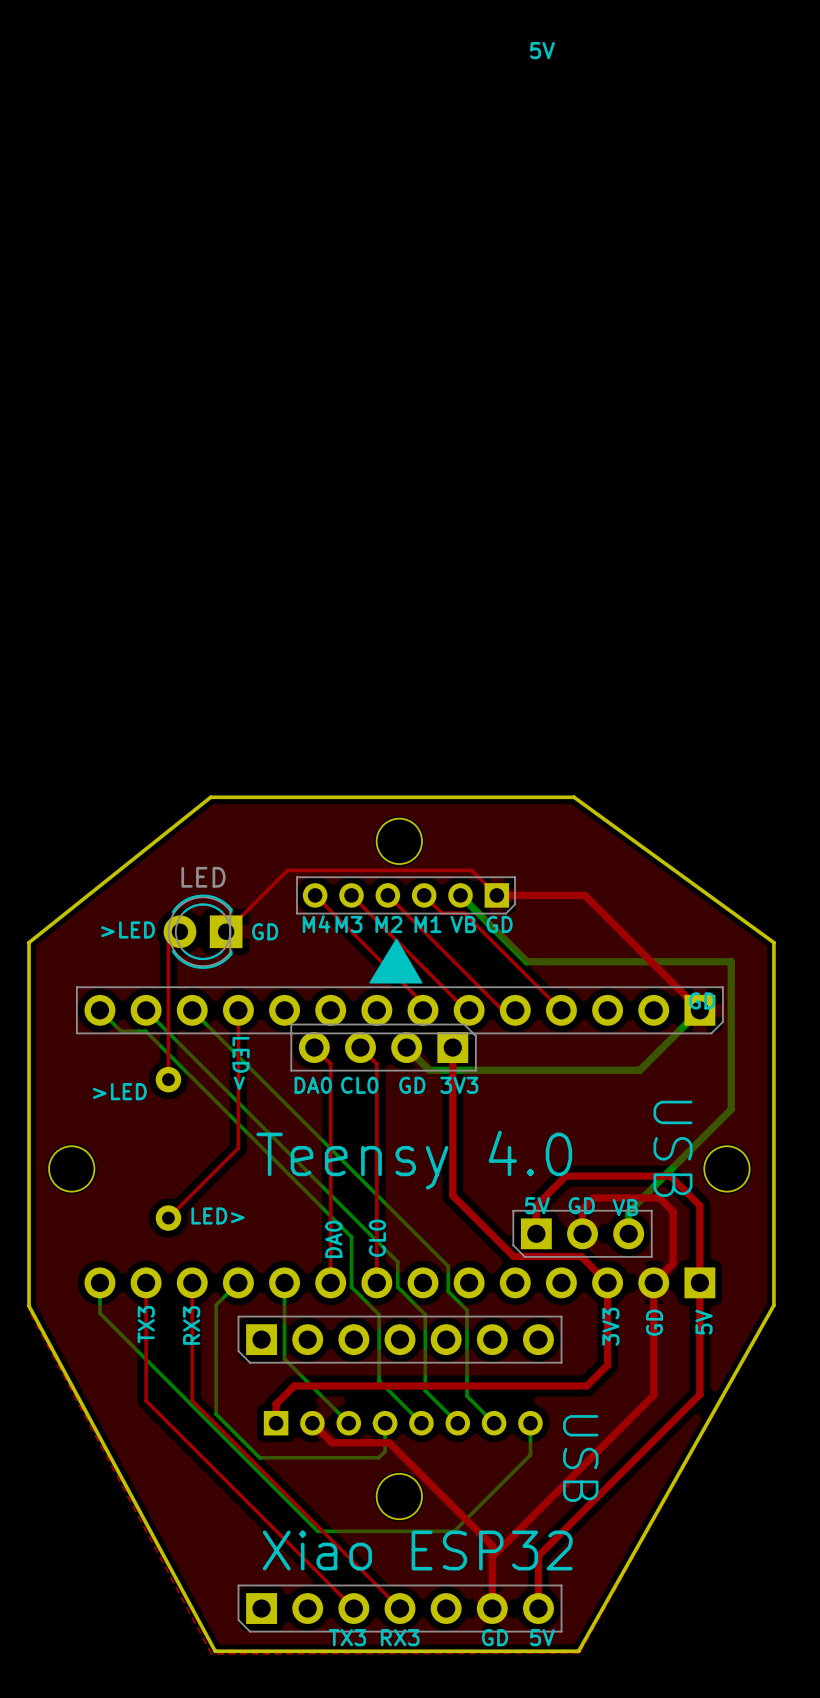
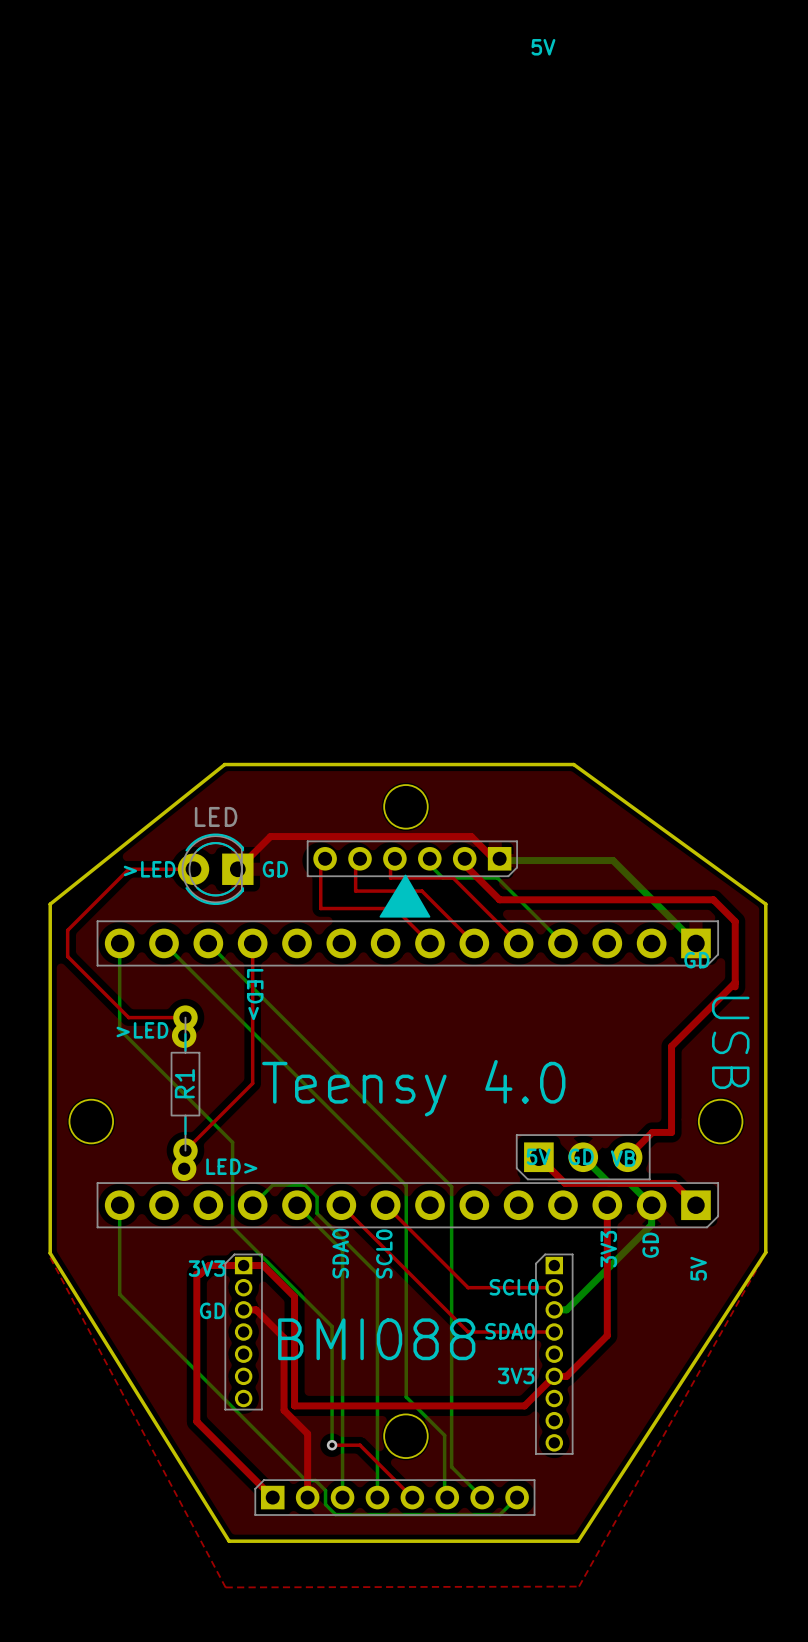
top track: (315, 895) (423, 1003) (423, 1010) -> none
top track: (351, 895) (466, 1010) (469, 1010) -> none
top track: (387, 895) (502, 1010) (515, 1010) -> none
top track: (424, 895) (441, 913) (464, 913) (561, 1010) -> none
bottom track: (460, 895) (526, 961) (731, 961) (731, 1109) (628, 1211) (628, 1233) -> none
top track: none -> (320, 860) (320, 908) (395, 908) (429, 943)
top track: none -> (355, 860) (355, 891) (421, 891) (474, 943)
top track: none -> (390, 860) (390, 877) (453, 877) (518, 943)
bottom track: none -> (425, 860) (442, 877) (497, 877) (562, 943)
top track: none -> (460, 860) (499, 899) (713, 899) (735, 921) (735, 986)
top track: none -> (495, 860) (471, 836) (270, 836) (237, 869)
bottom track: none -> (495, 860) (613, 860) (695, 943)
top track: none -> (193, 869) (128, 869) (67, 930) (67, 956) (128, 1017) (185, 1017)
text: M4 (316, 924) -> none
text: M3 (348, 924) -> none
text: M2 (388, 924) -> none
text: M1 (427, 924) -> none
text: VB (463, 924) -> none
text: GD (499, 924) -> none
text position: >LED (128, 929) -> >LED (149, 869)
top track: (179, 931) (168, 943) (168, 1079) -> none
part position: (203, 931) -> (215, 869)
top track: (226, 931) (287, 870) (471, 870) (496, 895) (584, 895) (699, 1010) -> none
text position: GD (265, 931) -> GD (275, 869)
drawing position: (395, 961) -> (404, 896)
bottom track: none -> (119, 943) (119, 1029) (232, 1142) (232, 1227) (332, 1326) (332, 1445)
bottom track: none -> (164, 943) (406, 1185) (406, 1397) (444, 1435) (444, 1494) (447, 1497)
bottom track: none -> (208, 943) (451, 1186) (451, 1467) (482, 1497)
top track: none -> (252, 943) (252, 1083) (185, 1150)
bottom track: (99, 1010) (120, 1031) (145, 1031) (351, 1237) (351, 1287) (379, 1314) (379, 1380) (421, 1423) -> none
bottom track: (146, 1010) (397, 1261) (397, 1287) (425, 1314) (425, 1390) (457, 1423) -> none
bottom track: (192, 1010) (448, 1266) (448, 1291) (467, 1310) (467, 1396) (494, 1423) -> none
top track: (238, 1010) (238, 1148) (168, 1218) -> none
part position: (399, 1010) -> (407, 943)
bottom track: (699, 1010) (639, 1070) (429, 1070) (406, 1047) -> none
top track: none -> (735, 982) (671, 1046) (671, 1132) (652, 1132) (627, 1157)
top track: (314, 1047) (330, 1063) (330, 1282) -> none
top track: (360, 1047) (376, 1063) (376, 1282) -> none
part: (383, 1047) -> none
top track: (452, 1047) (452, 1195) (513, 1256) (581, 1256) (607, 1282) (607, 1365) (586, 1385) -> none
text position: LED> (241, 1063) -> LED> (255, 994)
text: DA0 (313, 1085) -> none
text: CL0 (359, 1085) -> none
text: GD (412, 1085) -> none
text: 3V3 (459, 1085) -> none
text position: >LED (119, 1091) -> >LED (142, 1030)
R1: none -> (185, 1084)
text position: USB (673, 1148) -> USB (730, 1042)
text position: Teensy 4.0 (414, 1160) -> Teensy 4.0 (413, 1088)
top track: none -> (538, 1157) (565, 1183) (674, 1183) (695, 1205)
bottom track: none -> (583, 1157) (609, 1183) (629, 1183) (651, 1205) (651, 1224) (566, 1309) (550, 1309)
top track: (536, 1233) (536, 1205) (565, 1176) (670, 1176) (699, 1205) (699, 1394) (538, 1556) (538, 1608) -> none
top track: (582, 1233) (582, 1209) (594, 1197) (659, 1197) (673, 1211) (673, 1263) (653, 1282) (653, 1395) (492, 1556) -> none
part position: (582, 1233) -> (583, 1157)
text: CL0 (377, 1238) -> none
text: DA0 (333, 1239) -> none
bottom track: none -> (119, 1205) (119, 1294) (305, 1480) (315, 1480) (325, 1490) (325, 1504) (335, 1514) (500, 1514) (517, 1497)
bottom track: none -> (252, 1205) (272, 1185) (305, 1185) (317, 1196) (317, 1213) (377, 1273) (377, 1497)
bottom track: none -> (297, 1205) (342, 1250) (342, 1497)
top track: none -> (341, 1205) (468, 1332) (554, 1332)
top track: none -> (385, 1205) (468, 1287) (554, 1287)
part: none -> (407, 1205)
top track: none -> (607, 1205) (607, 1335) (566, 1376) (554, 1376) (524, 1405) (294, 1405) (294, 1296) (263, 1265) (208, 1265) (200, 1274) (196, 1274) (196, 1421) (272, 1497)
bottom track: (99, 1282) (99, 1313) (317, 1531) (454, 1531) (530, 1455) (530, 1423) -> none
top track: (146, 1282) (146, 1400) (353, 1608) -> none
top track: (192, 1282) (192, 1400) (400, 1608) -> none
bottom track: (238, 1282) (216, 1305) (216, 1414) (259, 1457) (378, 1457) (385, 1451) (385, 1423) (373, 1423) -> none
bottom track: (284, 1282) (284, 1358) (348, 1423) -> none
part: (399, 1282) -> none
board edge: (773, 1305) (578, 1651) (215, 1651) (29, 1306) -> (765, 1252) (578, 1541) (229, 1541) (50, 1253)
text: none -> SDA0 (340, 1253)
text: none -> SCL0 (384, 1254)
text: none -> 3V3 (207, 1268)
text position: GD (654, 1322) -> GD (650, 1245)
text: TX3 (146, 1324) -> none
text: RX3 (191, 1325) -> none
text position: 3V3 (610, 1326) -> 3V3 (608, 1249)
part: (400, 1339) -> none
text: none -> SCL0 (514, 1287)
top track: none -> (243, 1309) (255, 1309) (284, 1337) (284, 1410) (307, 1433) (307, 1497)
text: none -> GD (212, 1310)
top track: (586, 1385) (294, 1385) (276, 1404) (276, 1423) -> none
text: none -> SDA0 (510, 1331)
part: none -> (243, 1332)
text: none -> BMI088 (376, 1339)
part: none -> (554, 1354)
top track: (312, 1423) (331, 1442) (389, 1442) (492, 1545) (492, 1608) -> none
part: (403, 1423) -> none
text: none -> 3V3 (516, 1375)
text: USB (580, 1458) -> none
top track: none -> (332, 1445) (360, 1445) (412, 1497)
via: none -> (332, 1445)
text: Xiao ESP32 (417, 1550) -> none
part: none -> (394, 1497)
part: (400, 1608) -> none
text: TX3 (347, 1637) -> none
text: RX3 (400, 1637) -> none
text: GD (495, 1637) -> none
text: 5V (542, 1637) -> none

